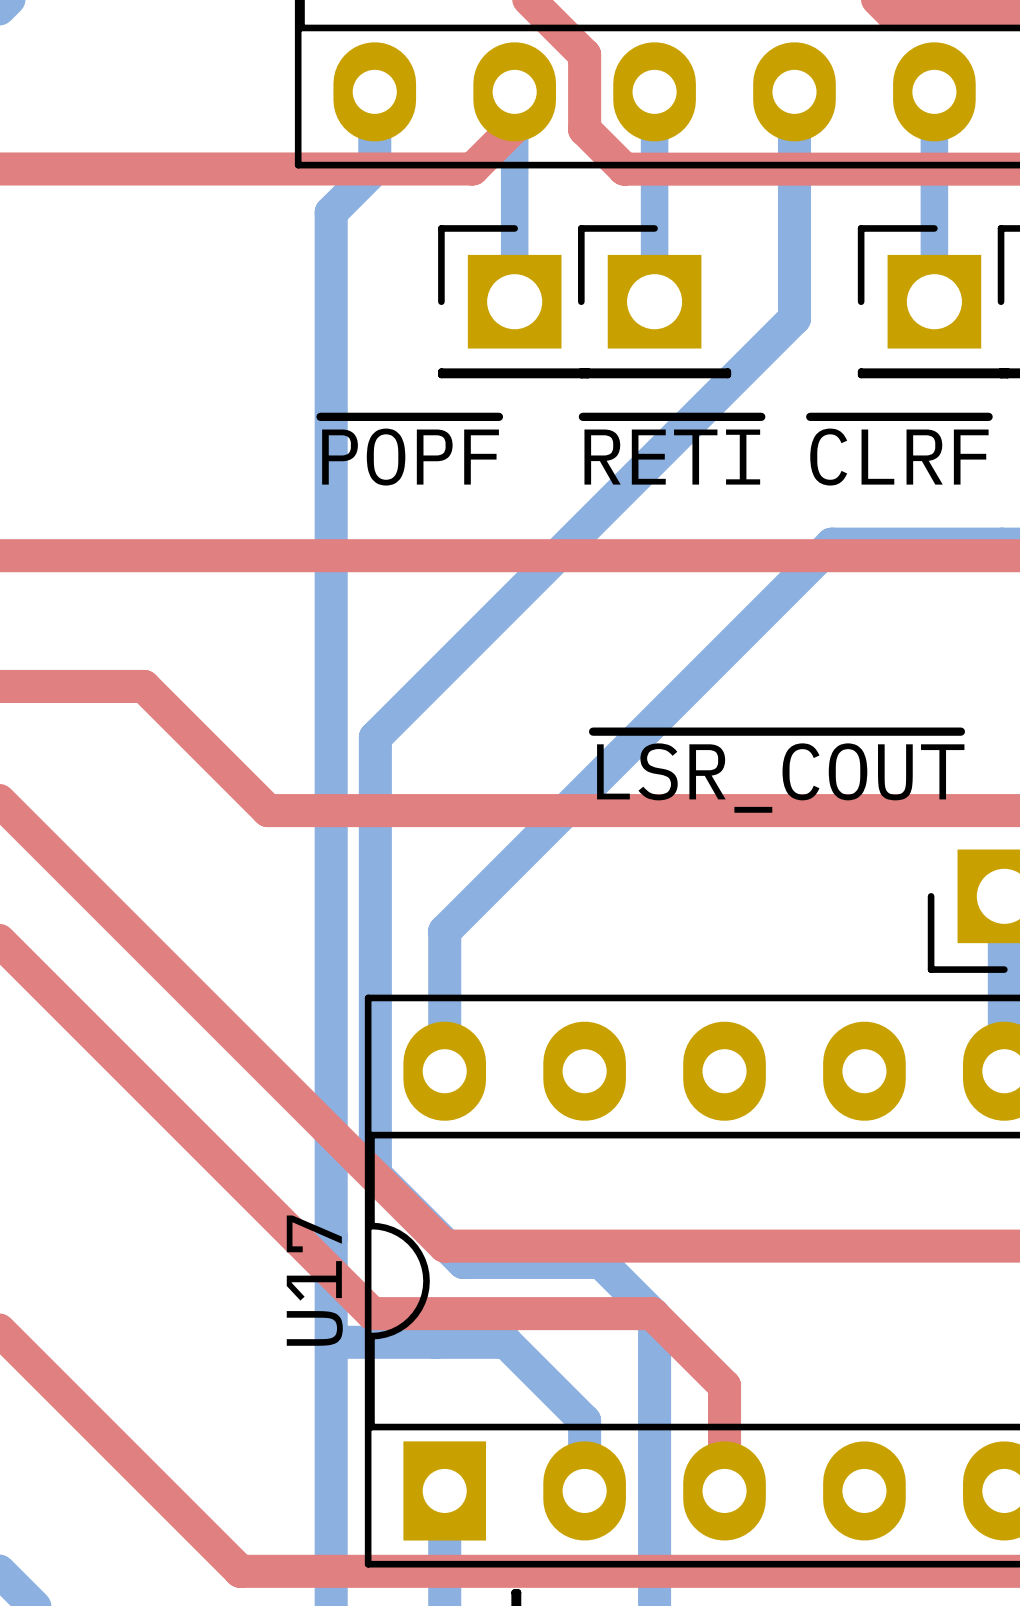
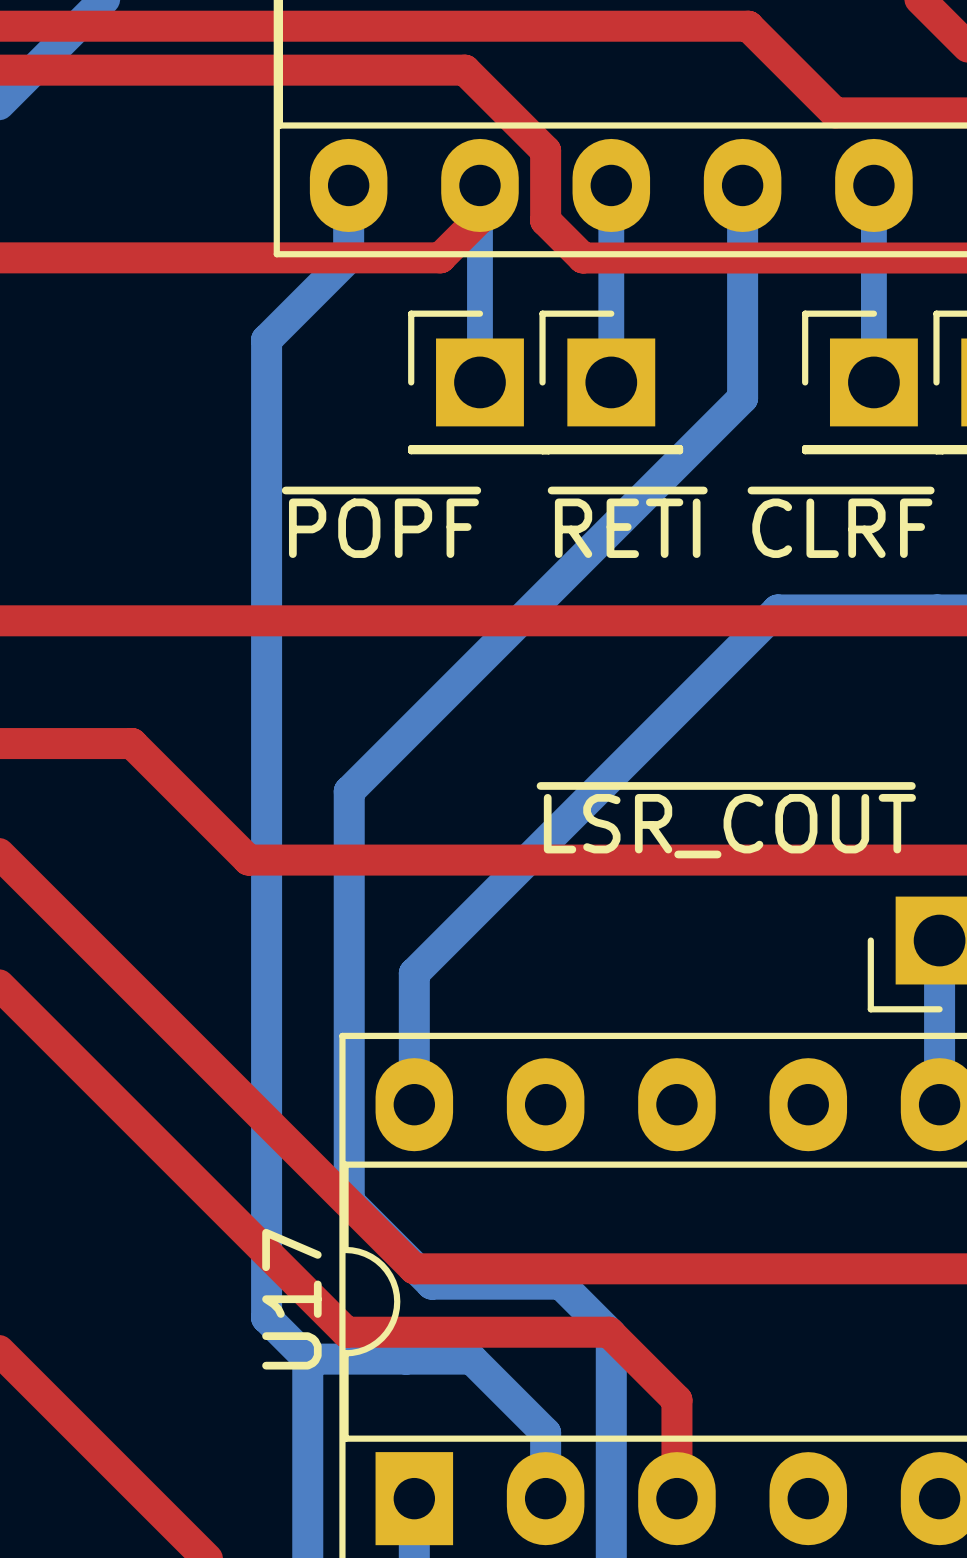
bottom track: (331, 212) (331, 1342) -> (307, 298) (266, 339) (266, 1317) (307, 1358)

